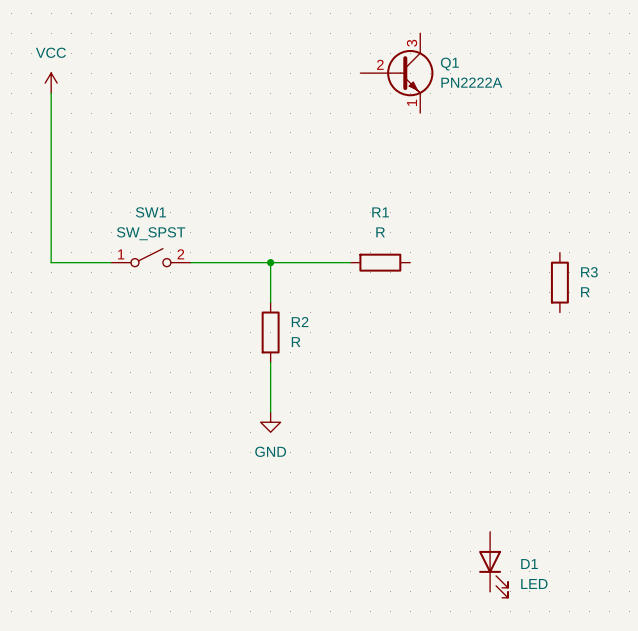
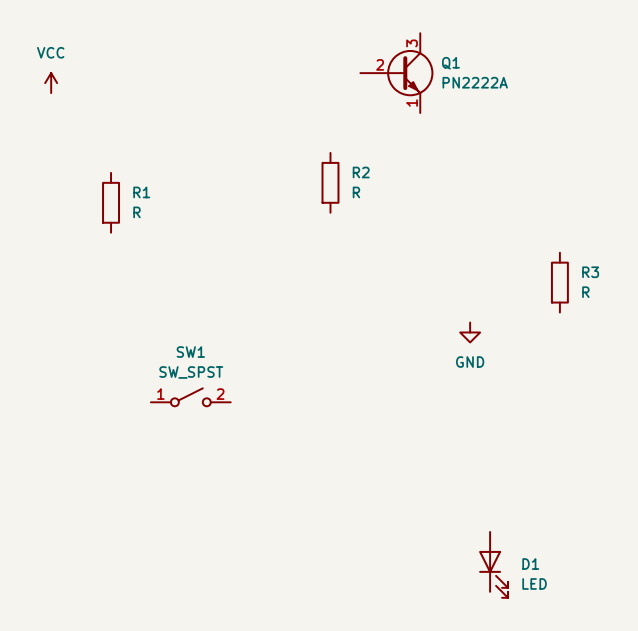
wire: (51, 93) (51, 262) (111, 262) -> none
R1 name position: R1 (380, 212) -> R1 (141, 192)
SW1 position: (150, 257) -> (190, 397)
wire: (190, 262) (350, 262) -> none
wire: (270, 262) (270, 302) -> none
junction: (270, 262) -> none
R1 rotation: 0° (380, 262) -> 90° clockwise (111, 202)
R1 position: (380, 262) -> (111, 202)
R2 position: (270, 332) -> (330, 182)
power symbol: none -> GND (470, 332)
wire: (270, 362) (270, 412) -> none
power symbol: GND (270, 422) -> none

